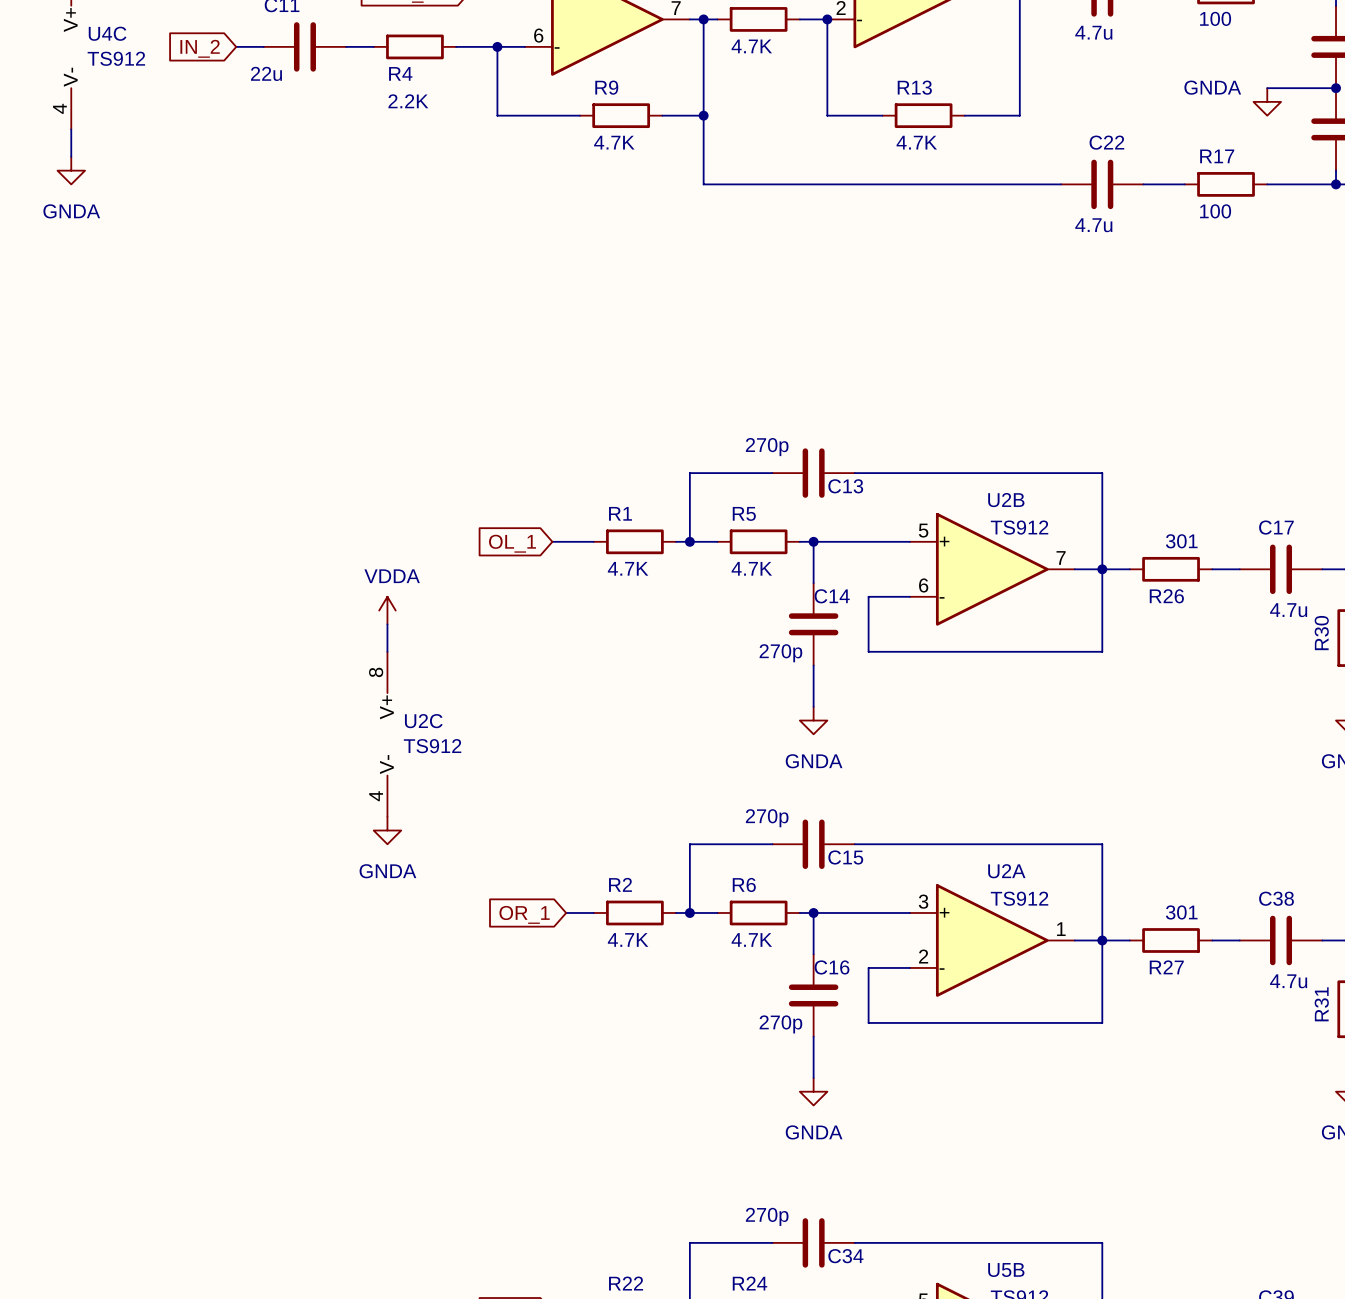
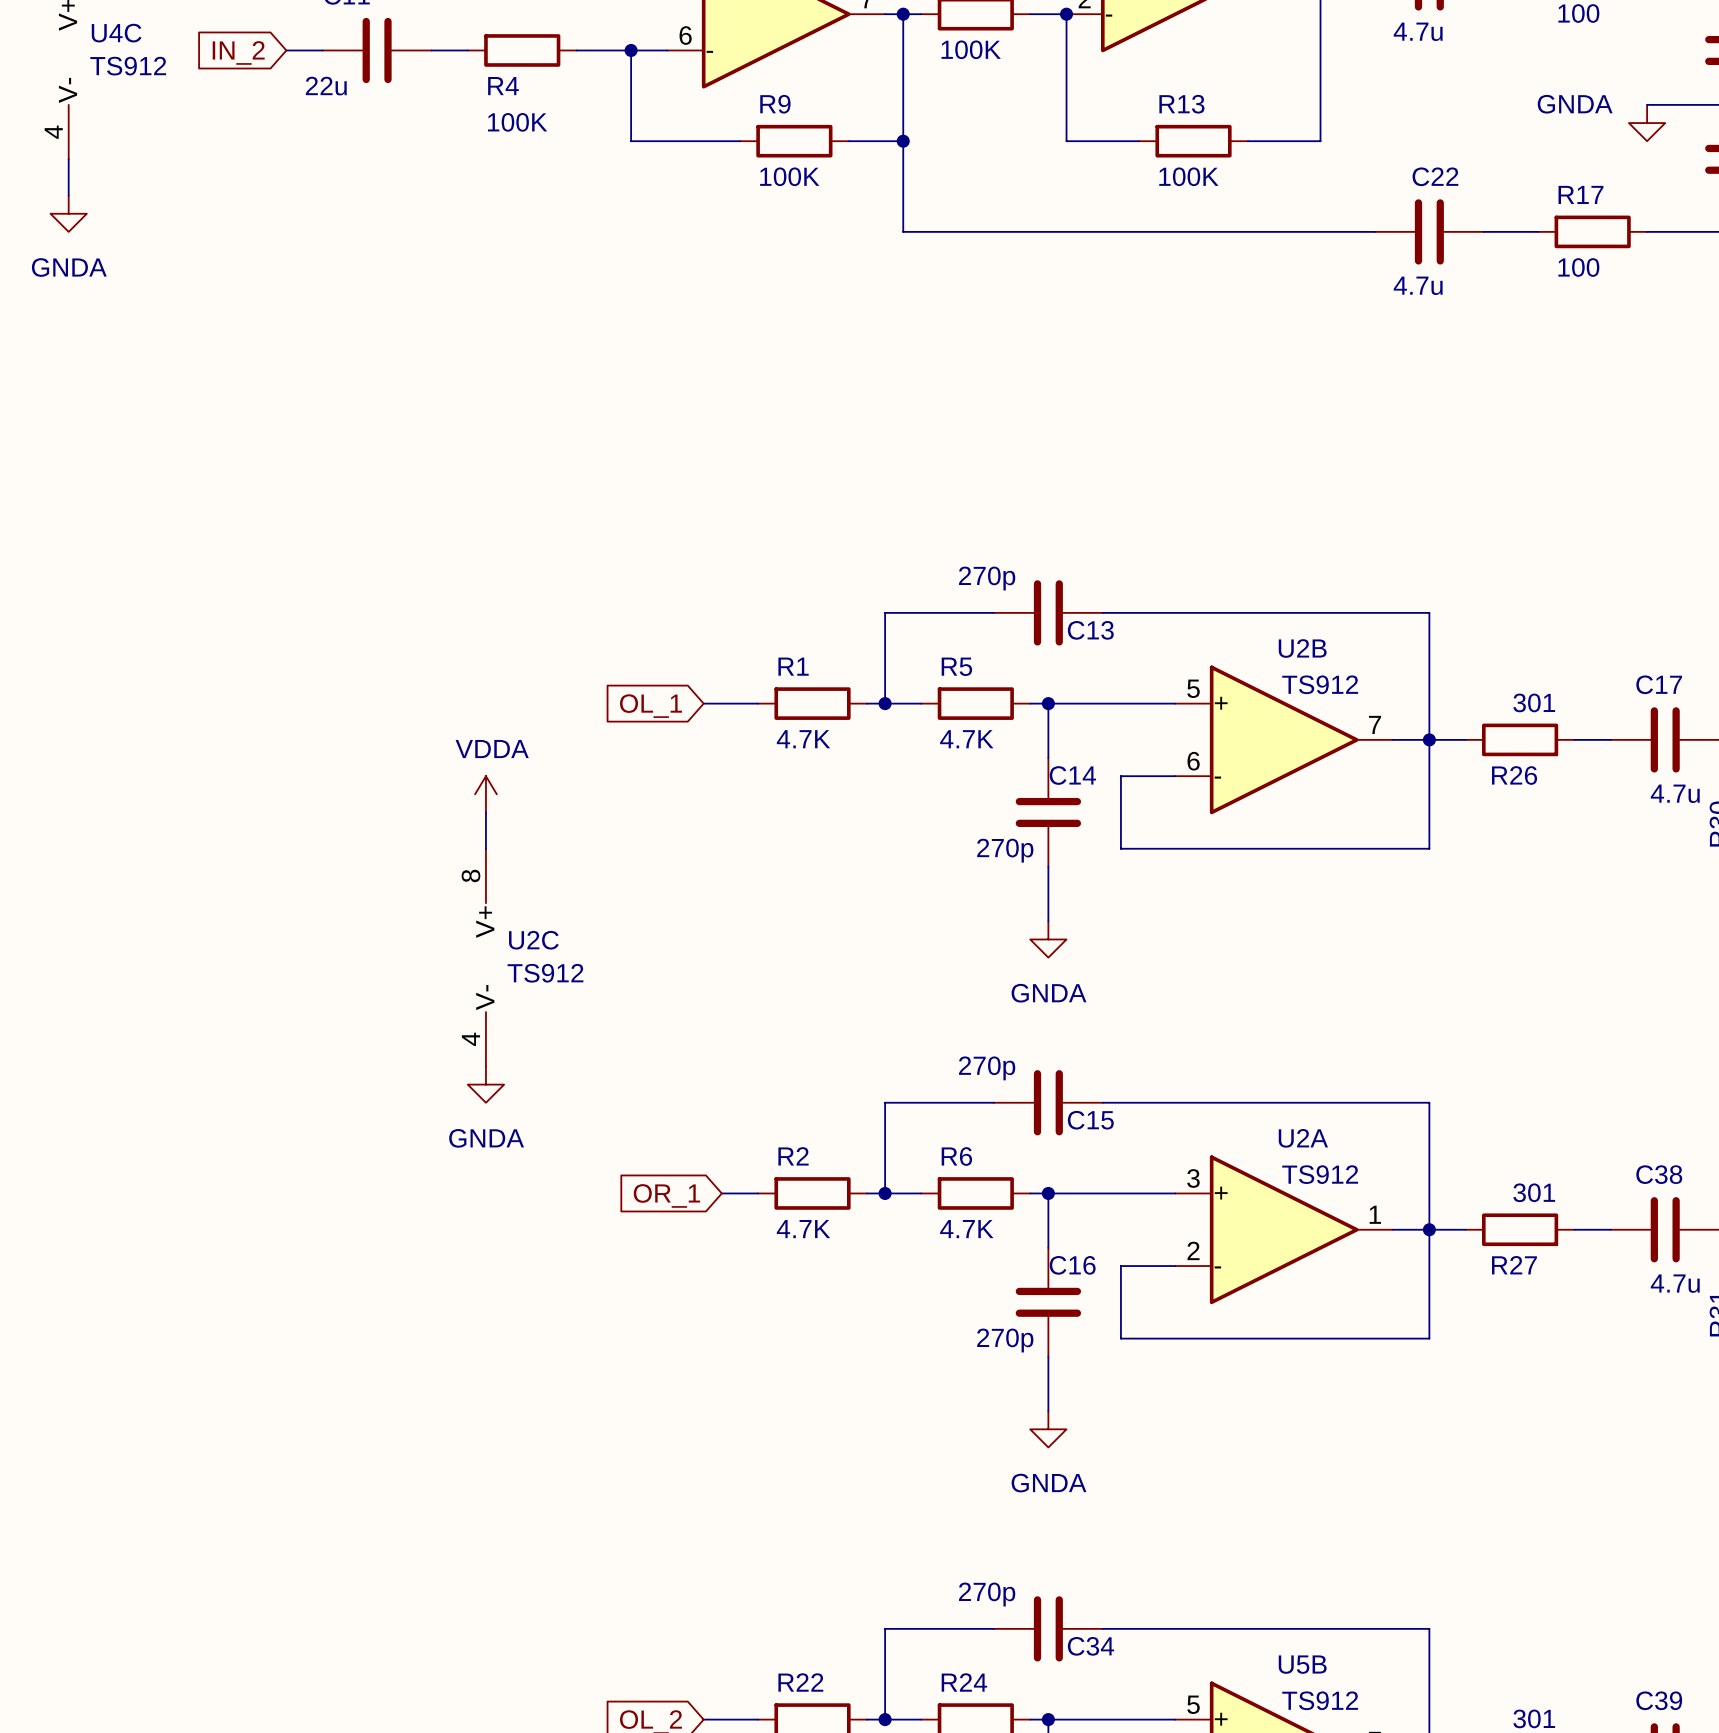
part value: 4.7K (751, 46) -> 100K (971, 49)
R4 value: 2.2K (408, 101) -> 100K (517, 122)
R9 value: 4.7K (614, 142) -> 100K (789, 176)
R13 value: 4.7K (916, 142) -> 100K (1188, 176)

